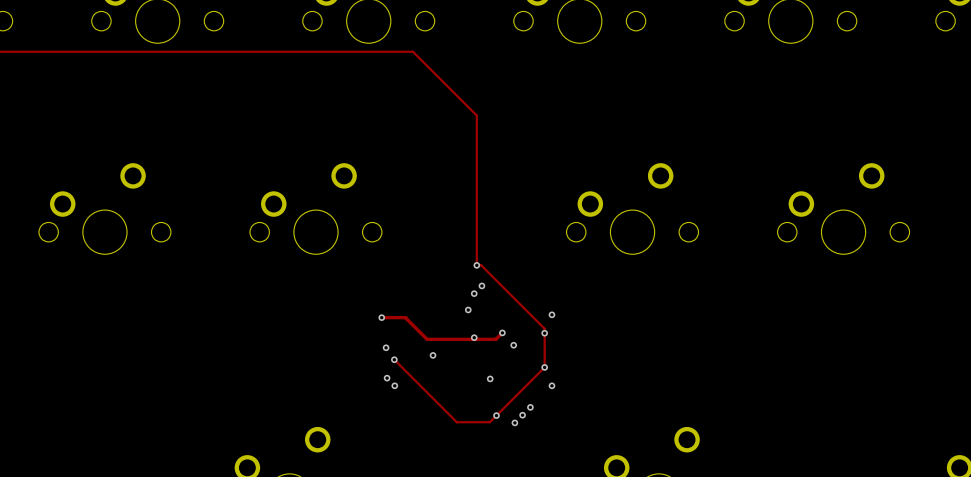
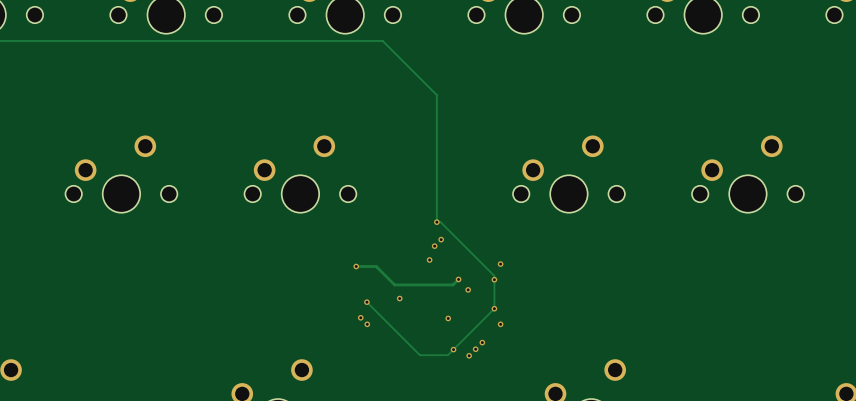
via: (474, 337) -> none
via: (386, 347) -> none

